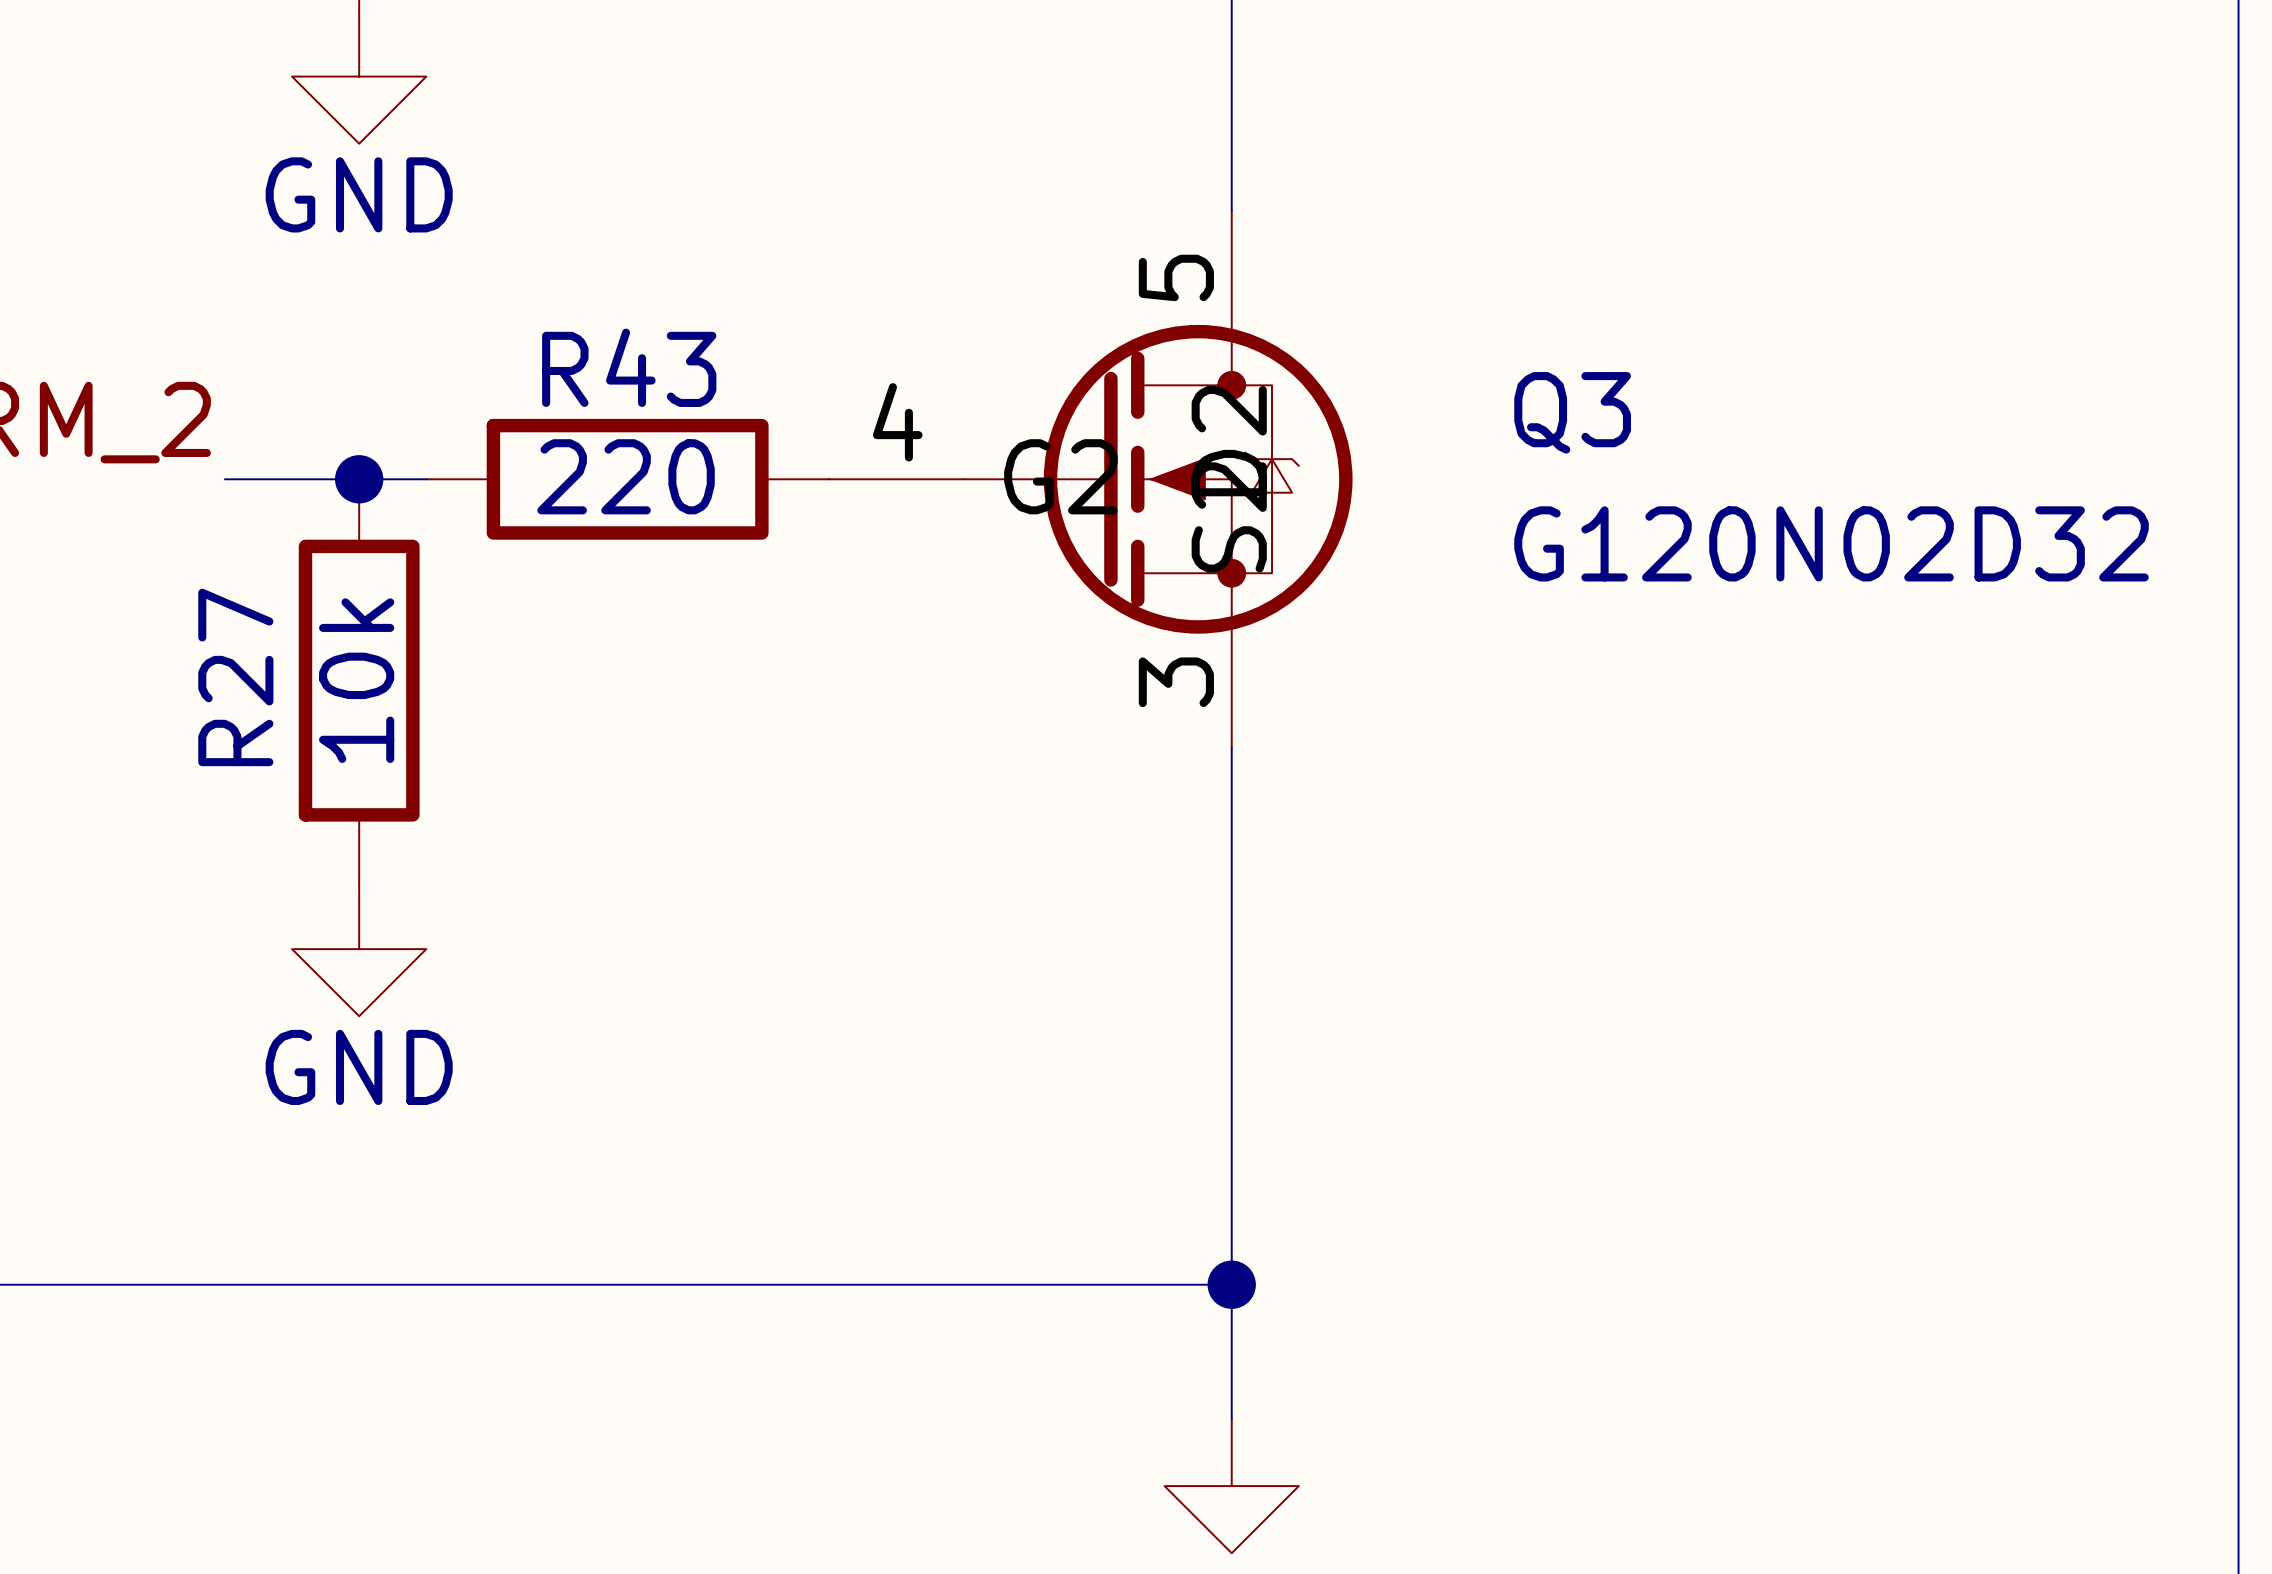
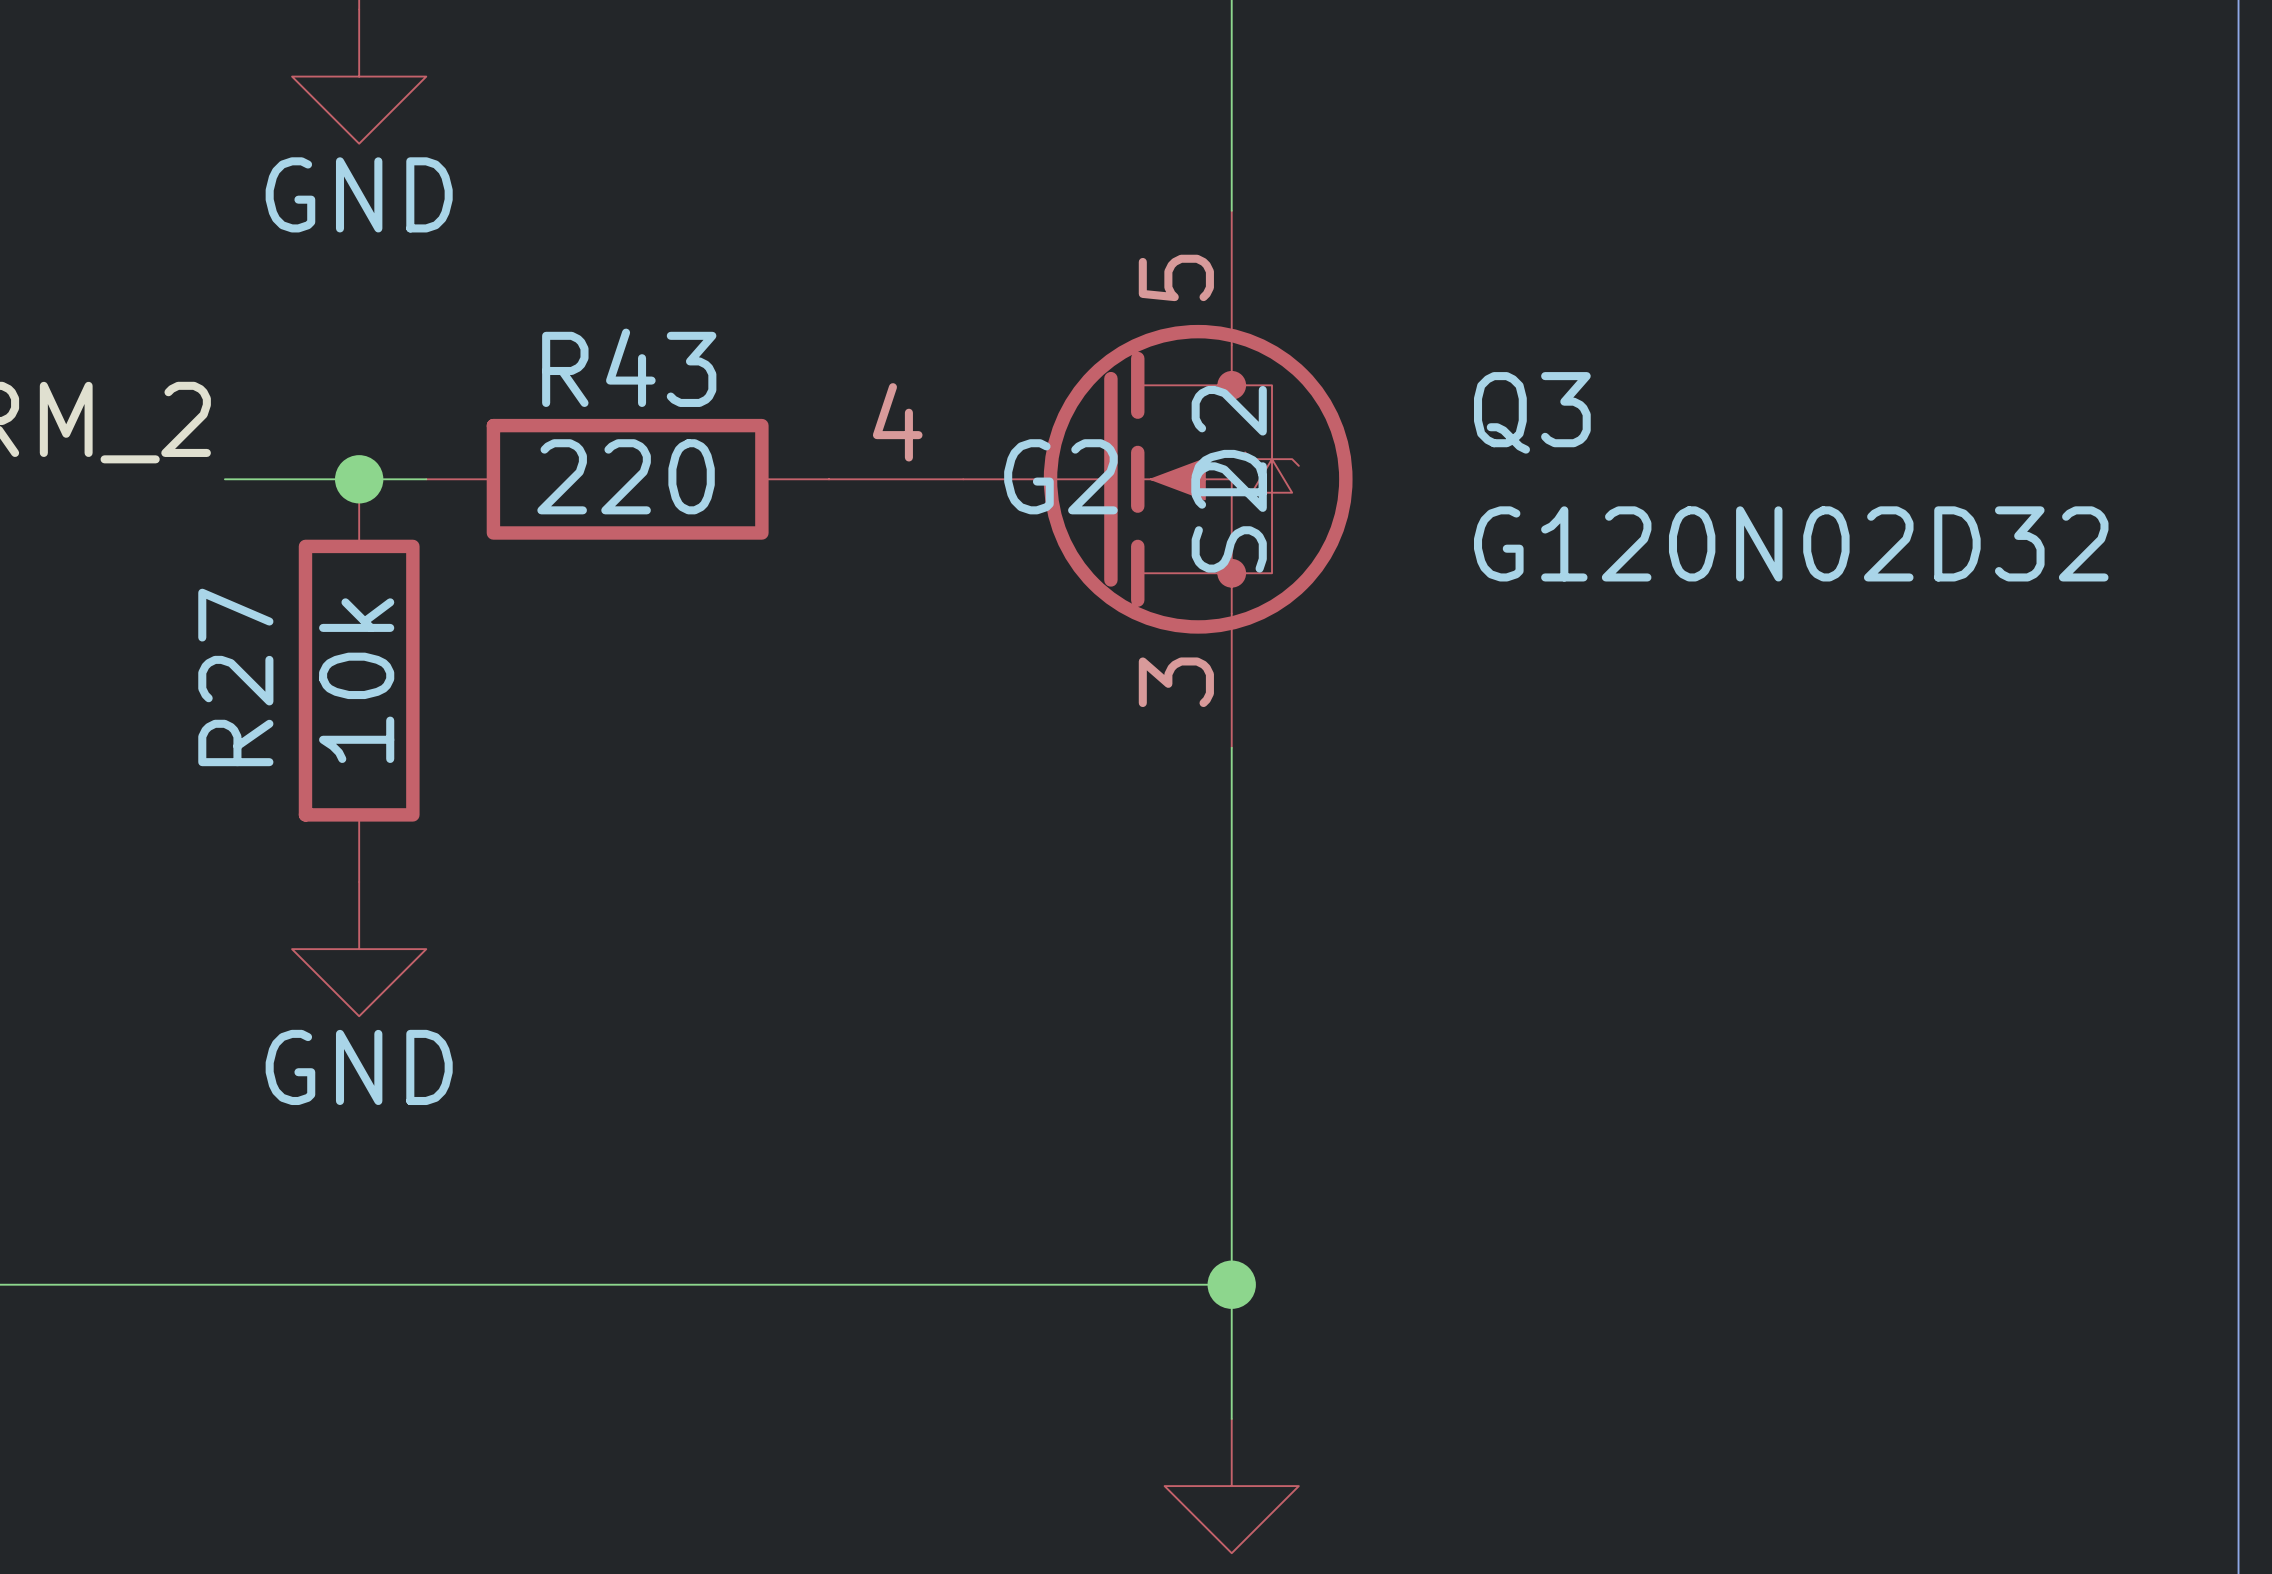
Q3 name position: Q3 (1572, 412) -> Q3 (1532, 412)
Q3 value position: G120N02D32 (1831, 543) -> G120N02D32 (1791, 543)

